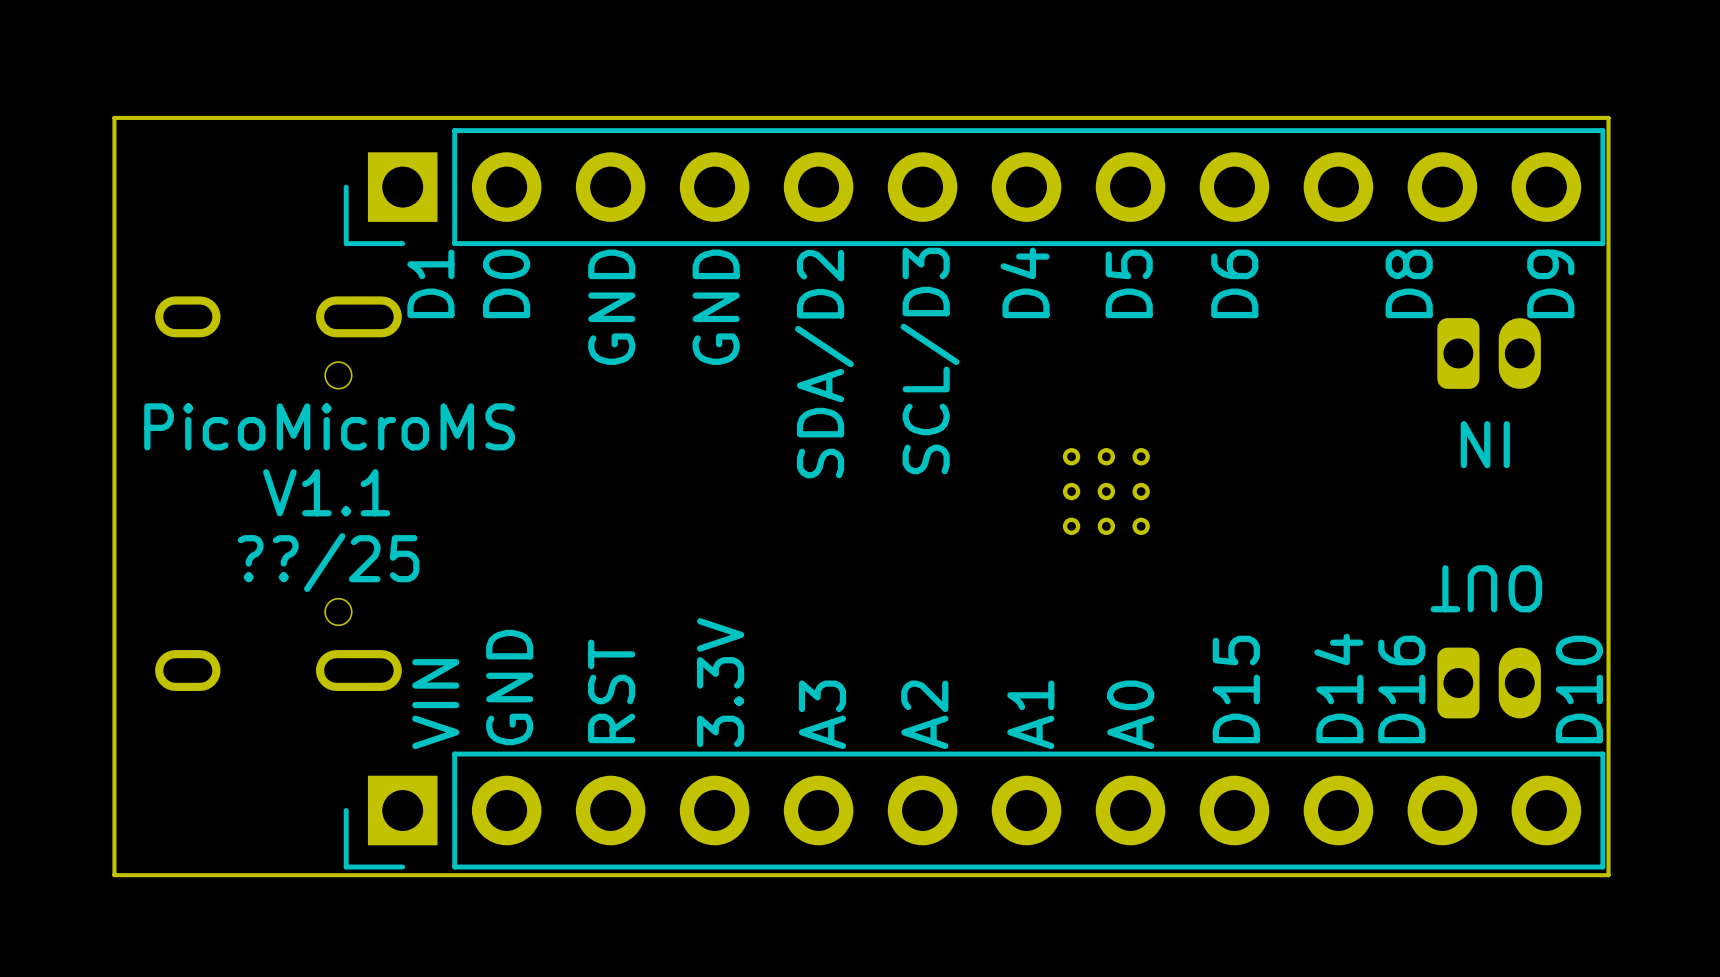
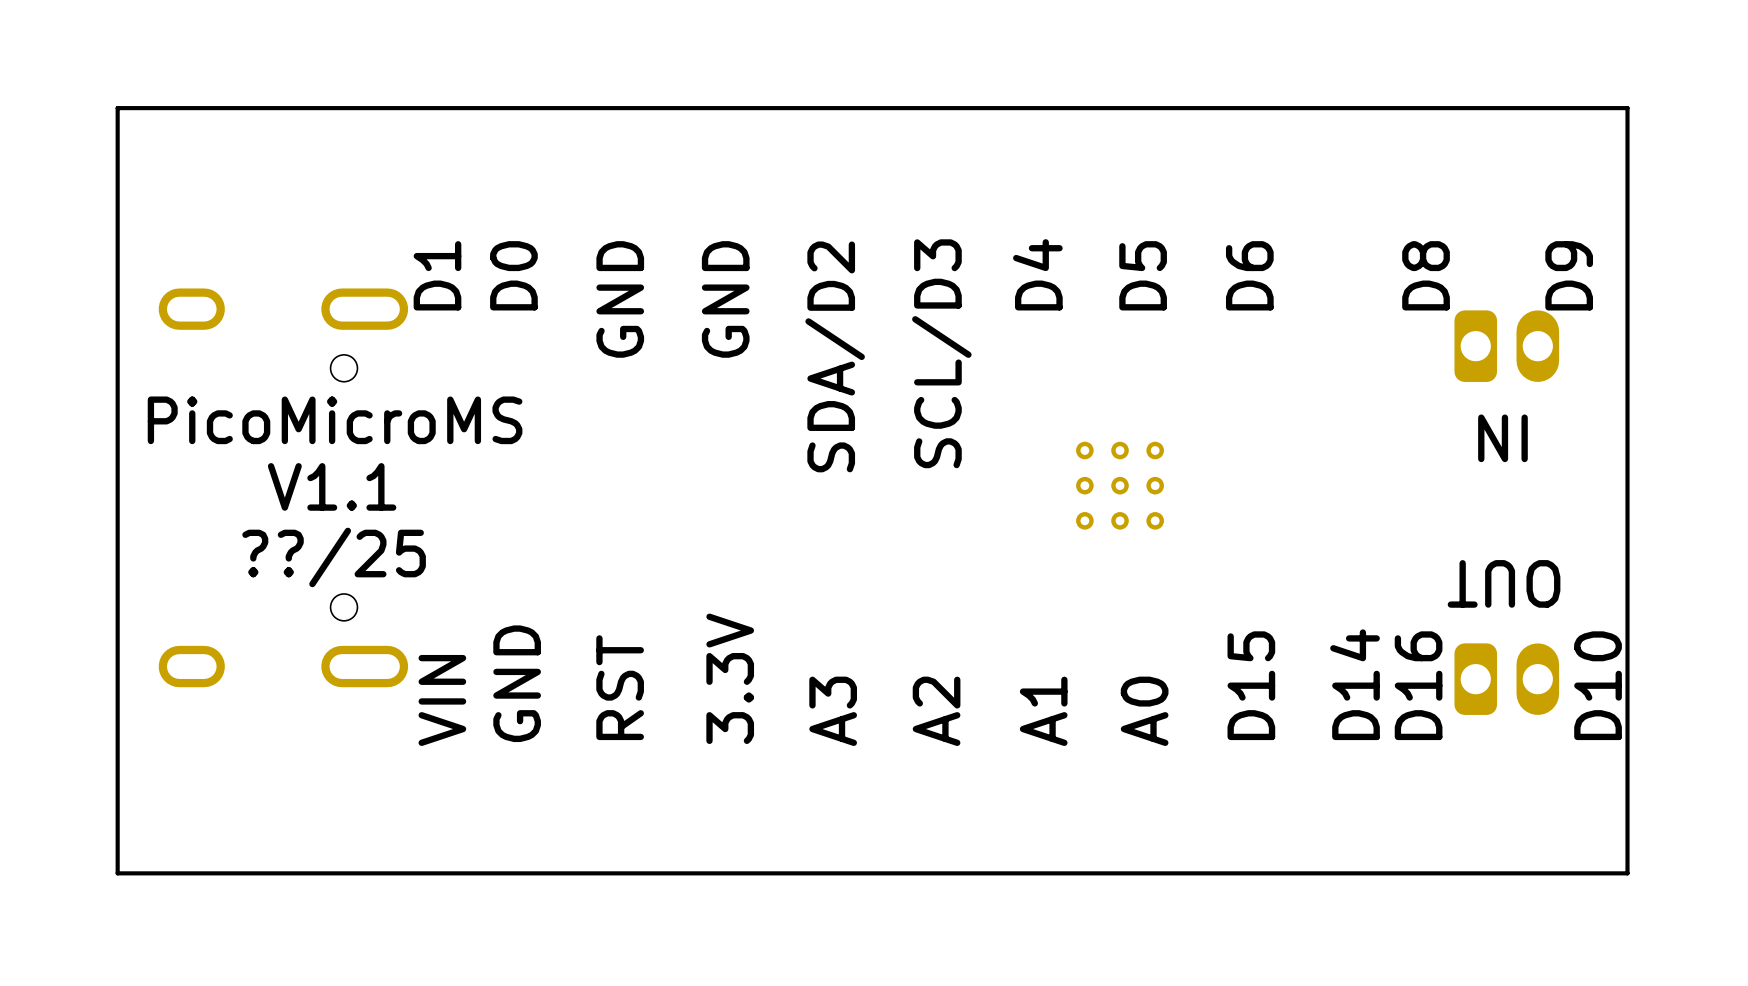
part: (974, 187) -> none
part: (974, 810) -> none

